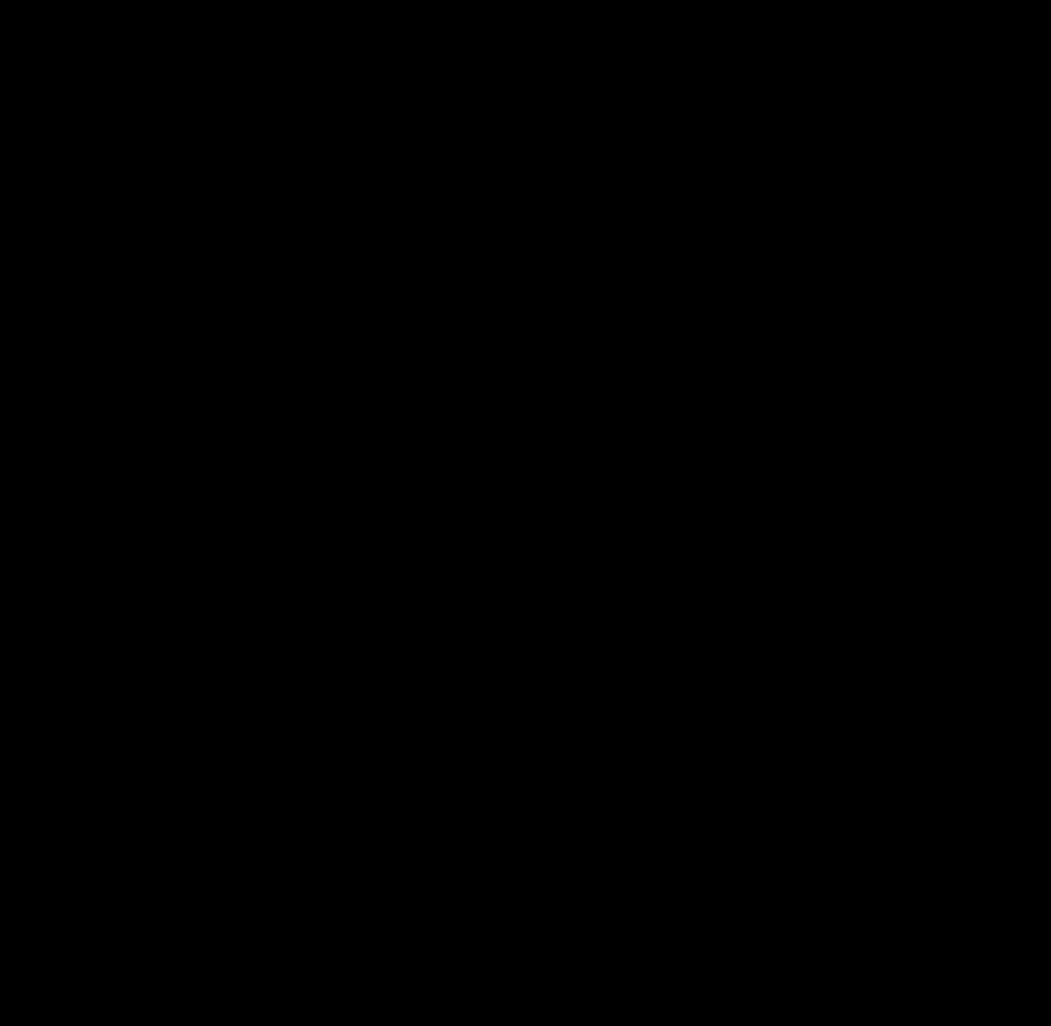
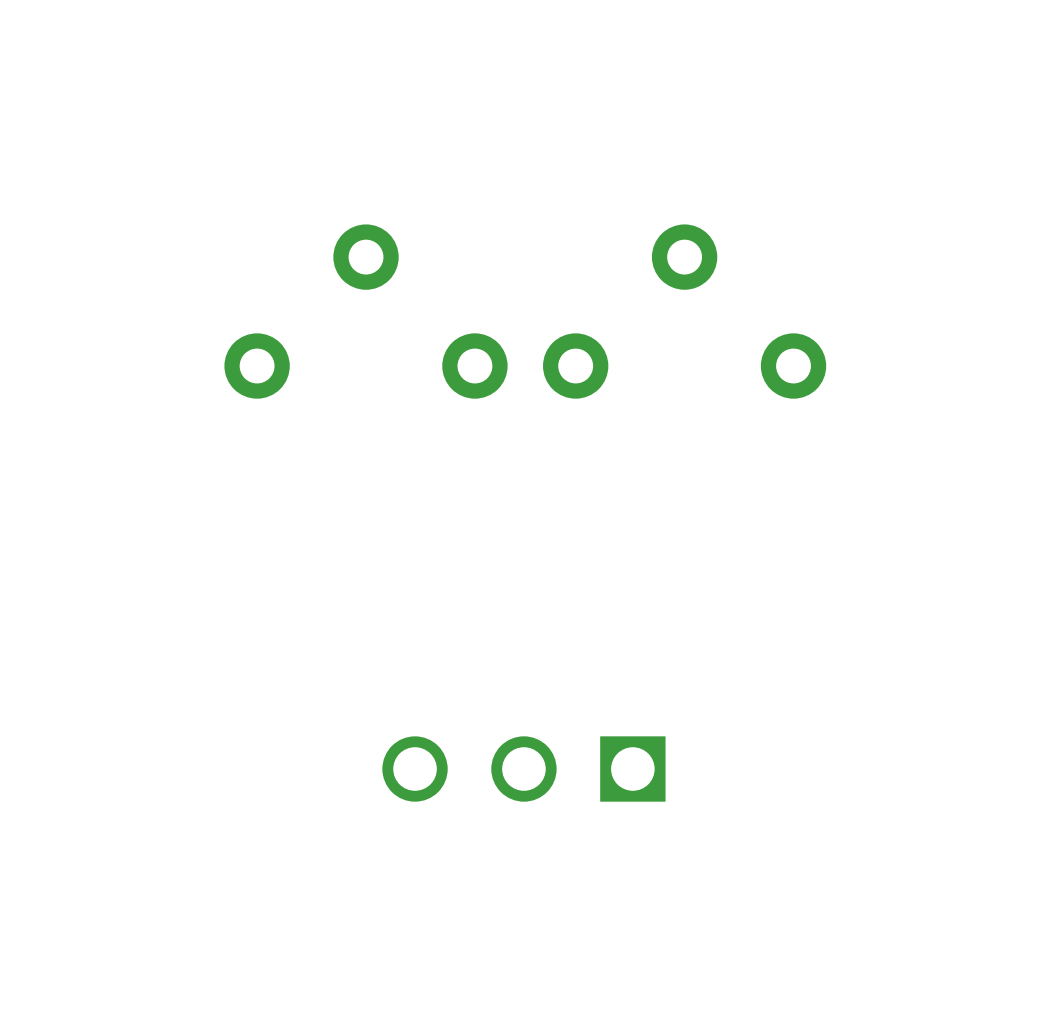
part: none -> (366, 311)
part: none -> (684, 311)
part: none -> (523, 769)

